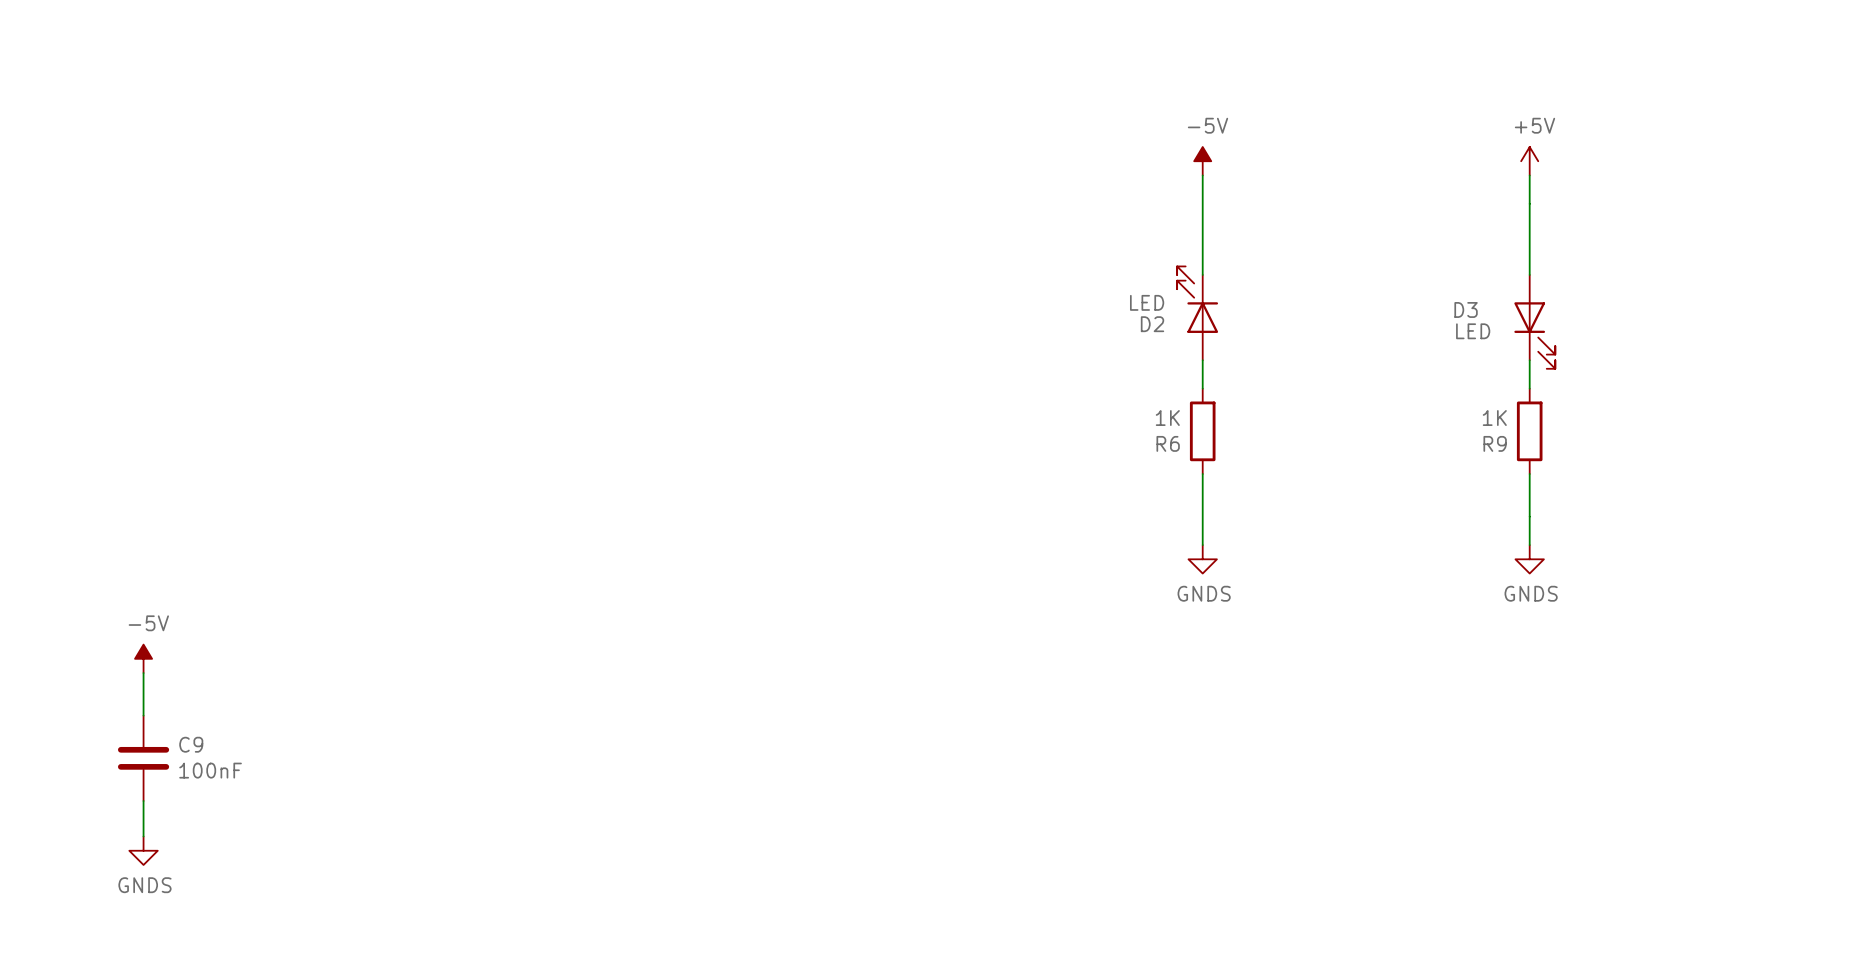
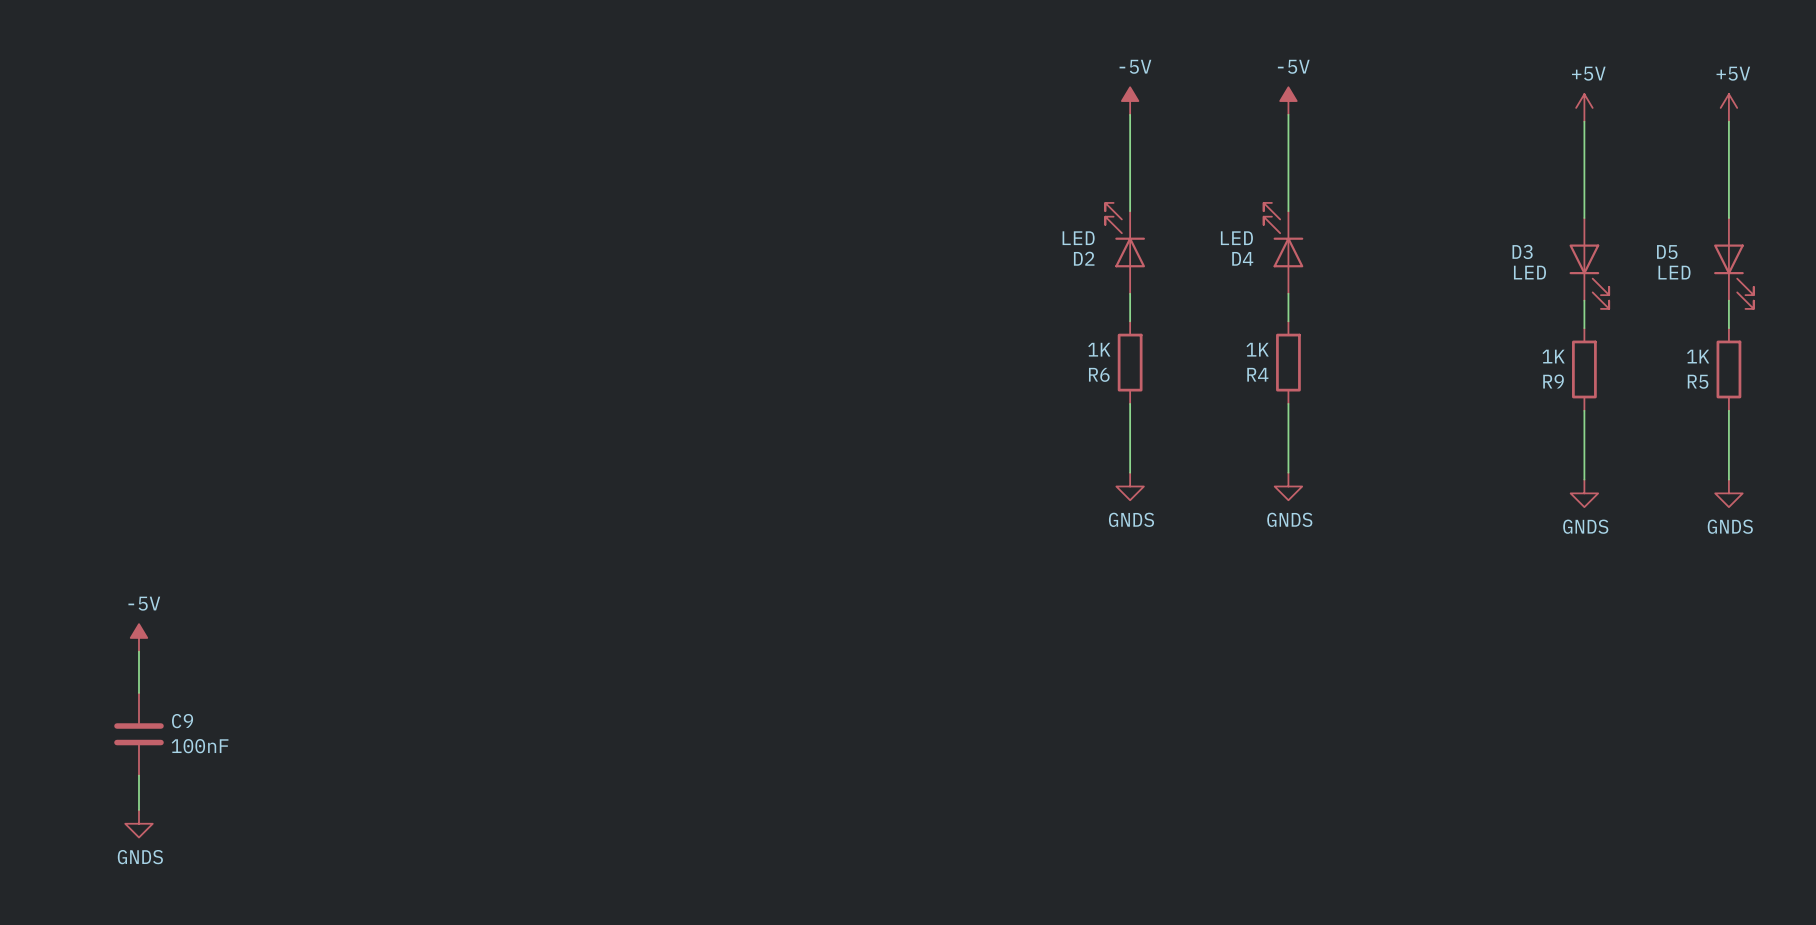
power symbol: none -> -5V (1288, 101)
power symbol: none -> +5V (1728, 107)
wire: none -> (1288, 114) (1288, 211)
wire: none -> (1728, 121) (1728, 218)
power symbol position: -5V (1202, 161) -> -5V (1130, 101)
power symbol position: +5V (1529, 161) -> +5V (1584, 107)
wire: (1202, 175) (1202, 274) -> (1130, 114) (1130, 211)
wire: (1529, 175) (1529, 274) -> (1584, 121) (1584, 218)
D4: none -> LED (1283, 248)
D5: none -> LED (1733, 263)
wire: none -> (1288, 293) (1288, 321)
wire: none -> (1728, 300) (1728, 328)
D2 position: (1197, 313) -> (1125, 248)
D3 position: (1534, 321) -> (1589, 263)
wire: (1202, 360) (1202, 388) -> (1130, 293) (1130, 321)
wire: (1529, 360) (1529, 388) -> (1584, 300) (1584, 328)
R4: none -> 1K (1288, 362)
R5: none -> 1K (1728, 369)
wire: none -> (1288, 403) (1288, 472)
wire: none -> (1728, 410) (1728, 479)
R6 position: (1202, 431) -> (1130, 362)
R9 position: (1529, 431) -> (1584, 369)
wire: (1202, 474) (1202, 545) -> (1130, 403) (1130, 472)
wire: (1529, 474) (1529, 545) -> (1584, 410) (1584, 479)
power symbol: none -> GNDS (1288, 486)
power symbol: none -> GNDS (1584, 493)
power symbol: none -> GNDS (1728, 493)
power symbol position: GNDS (1202, 559) -> GNDS (1130, 486)
power symbol: GNDS (1529, 559) -> none

